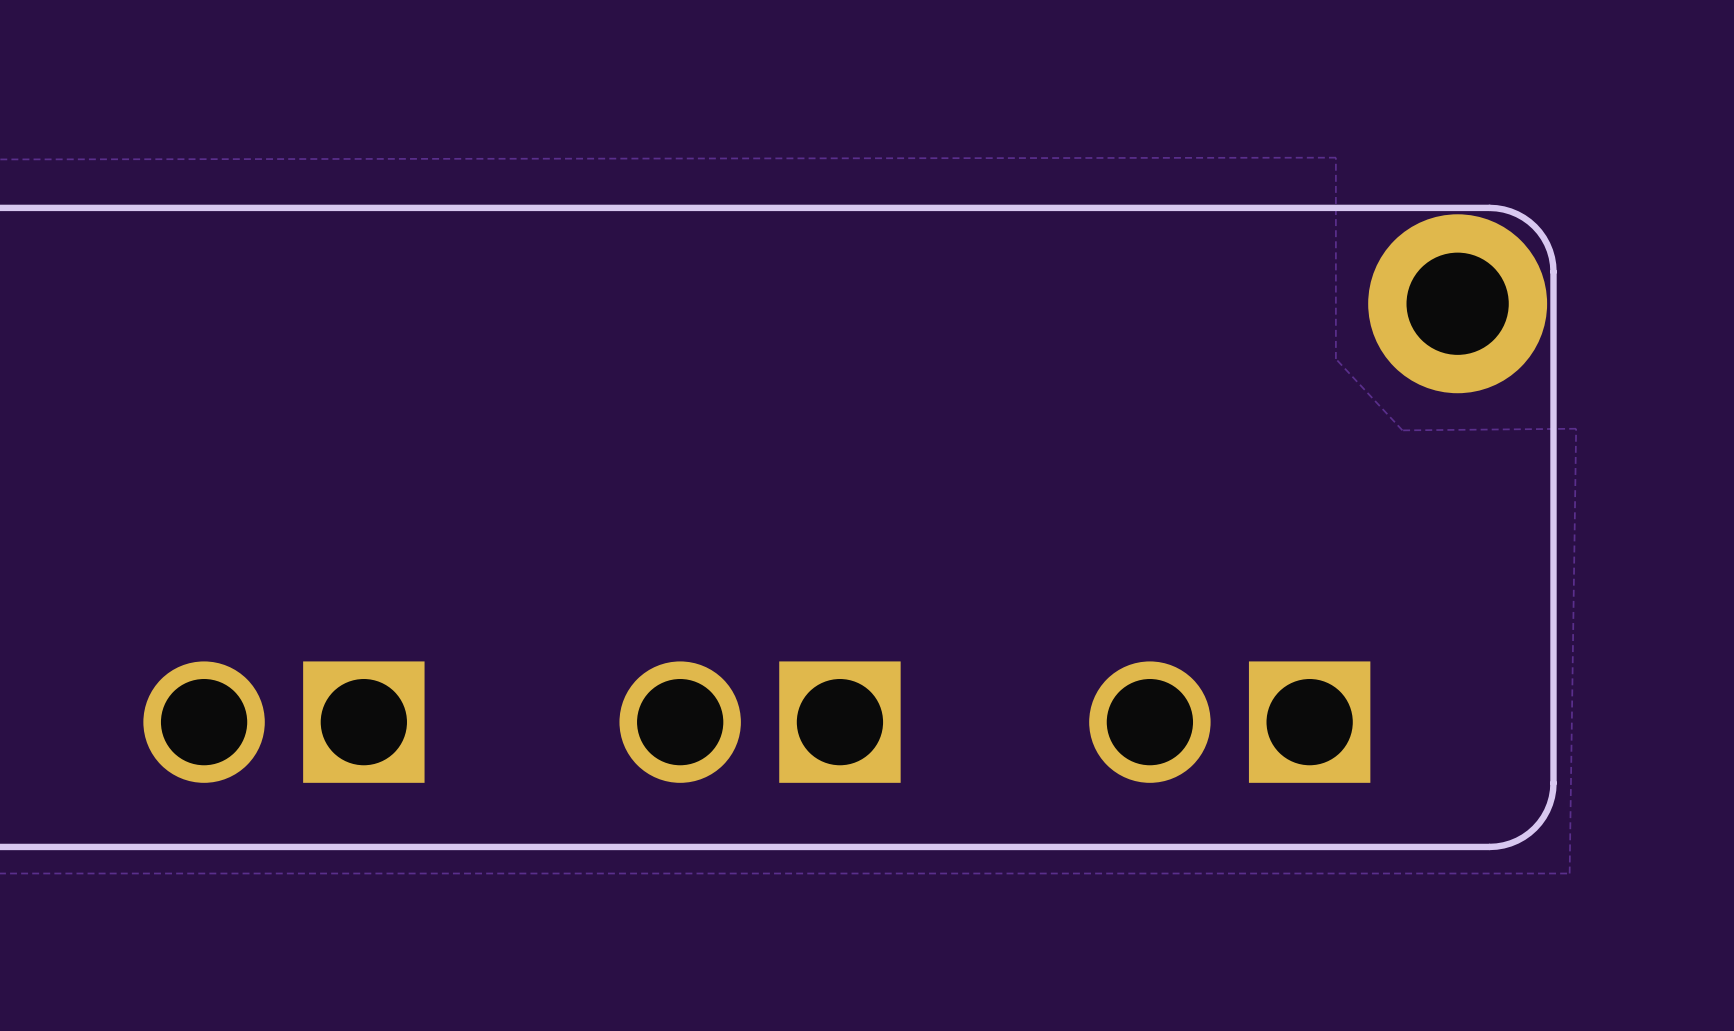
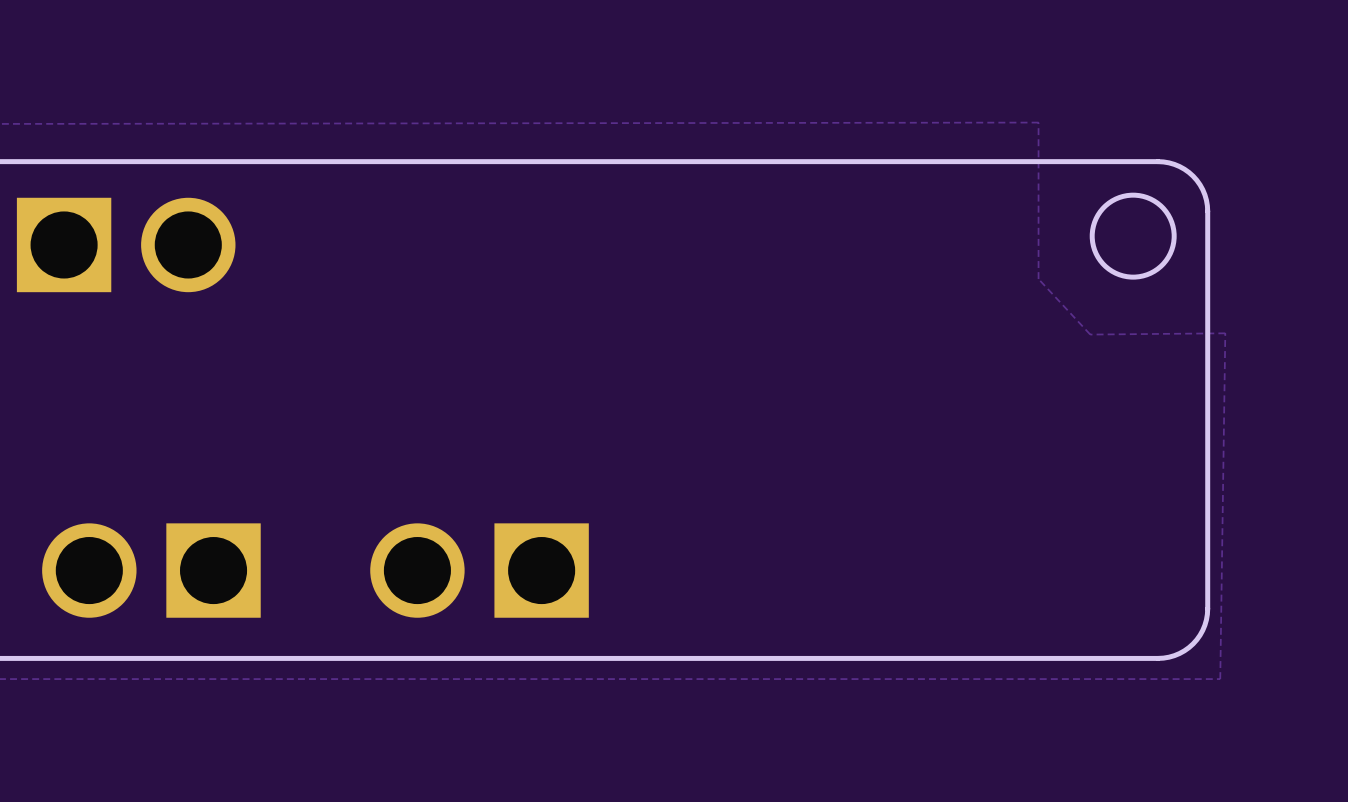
round board edge: none -> [1089, 192, 1177, 280]
part: (1457, 303) -> none
part: none -> (126, 244)
part position: (283, 722) -> (151, 570)
part position: (760, 722) -> (479, 570)
part: (1229, 722) -> none

